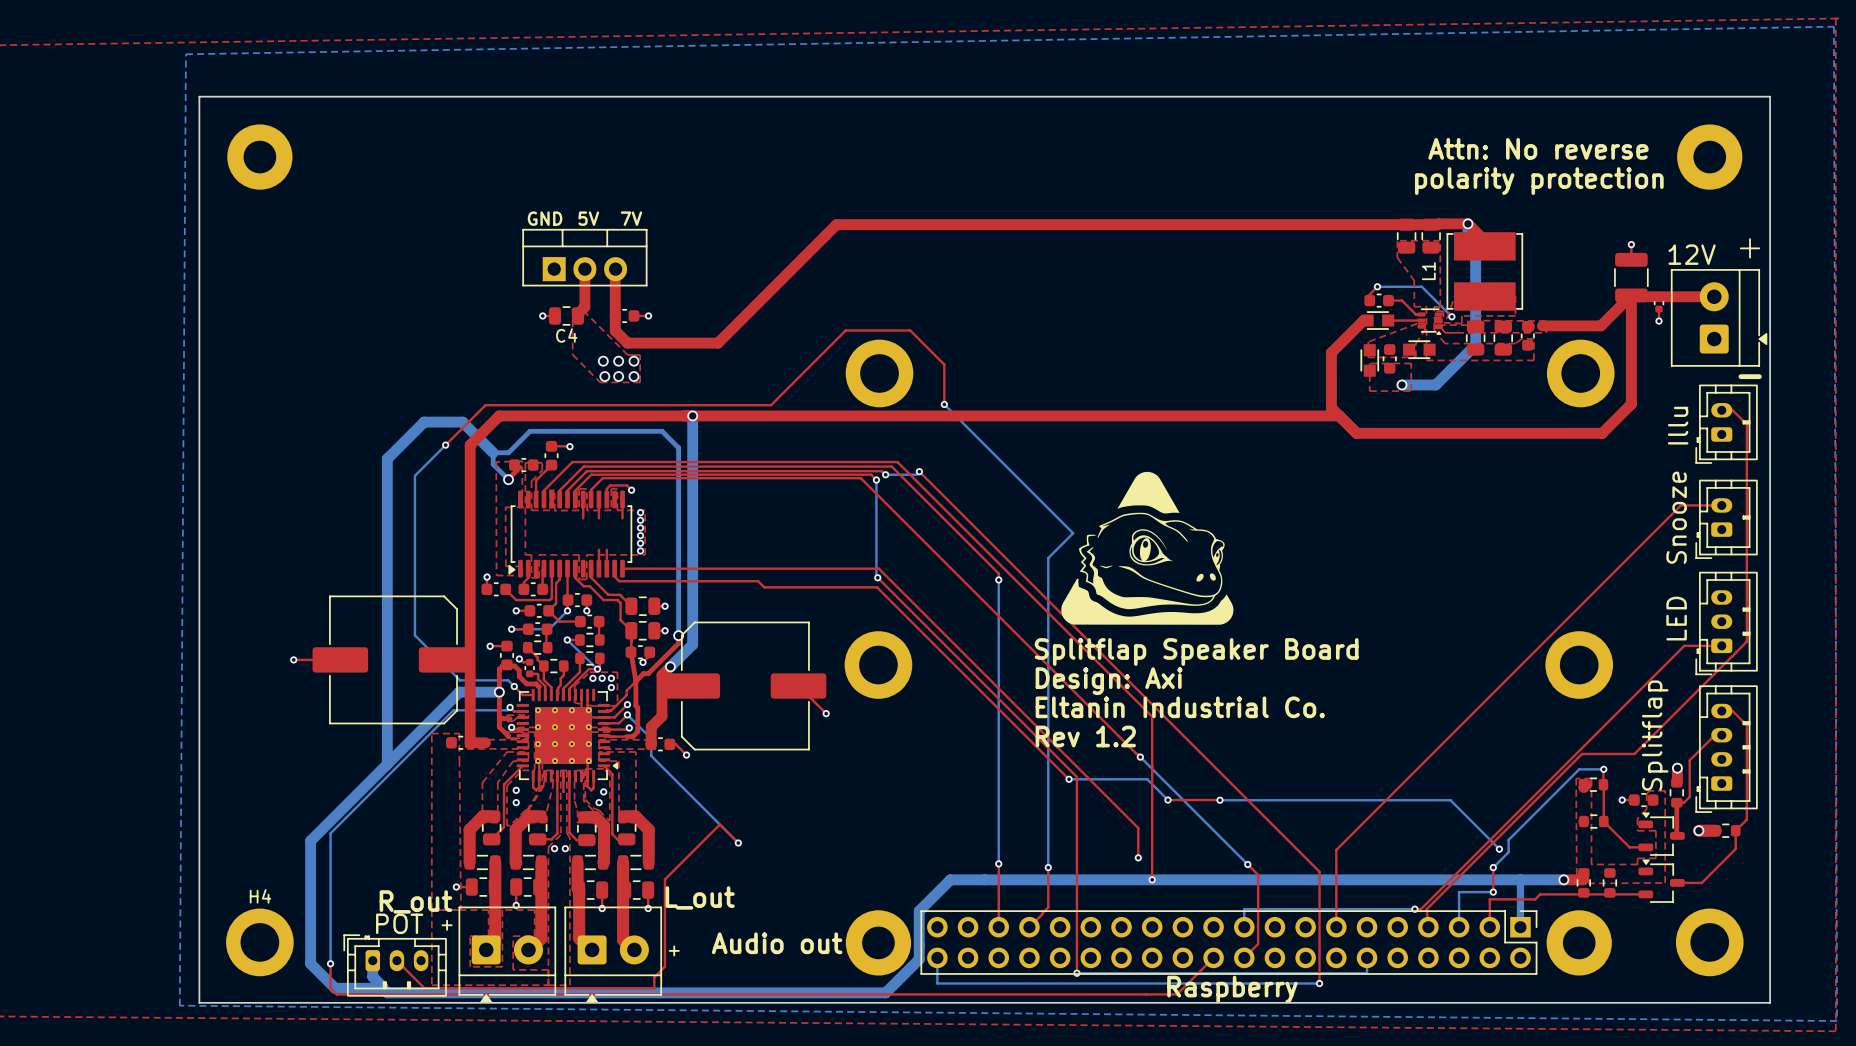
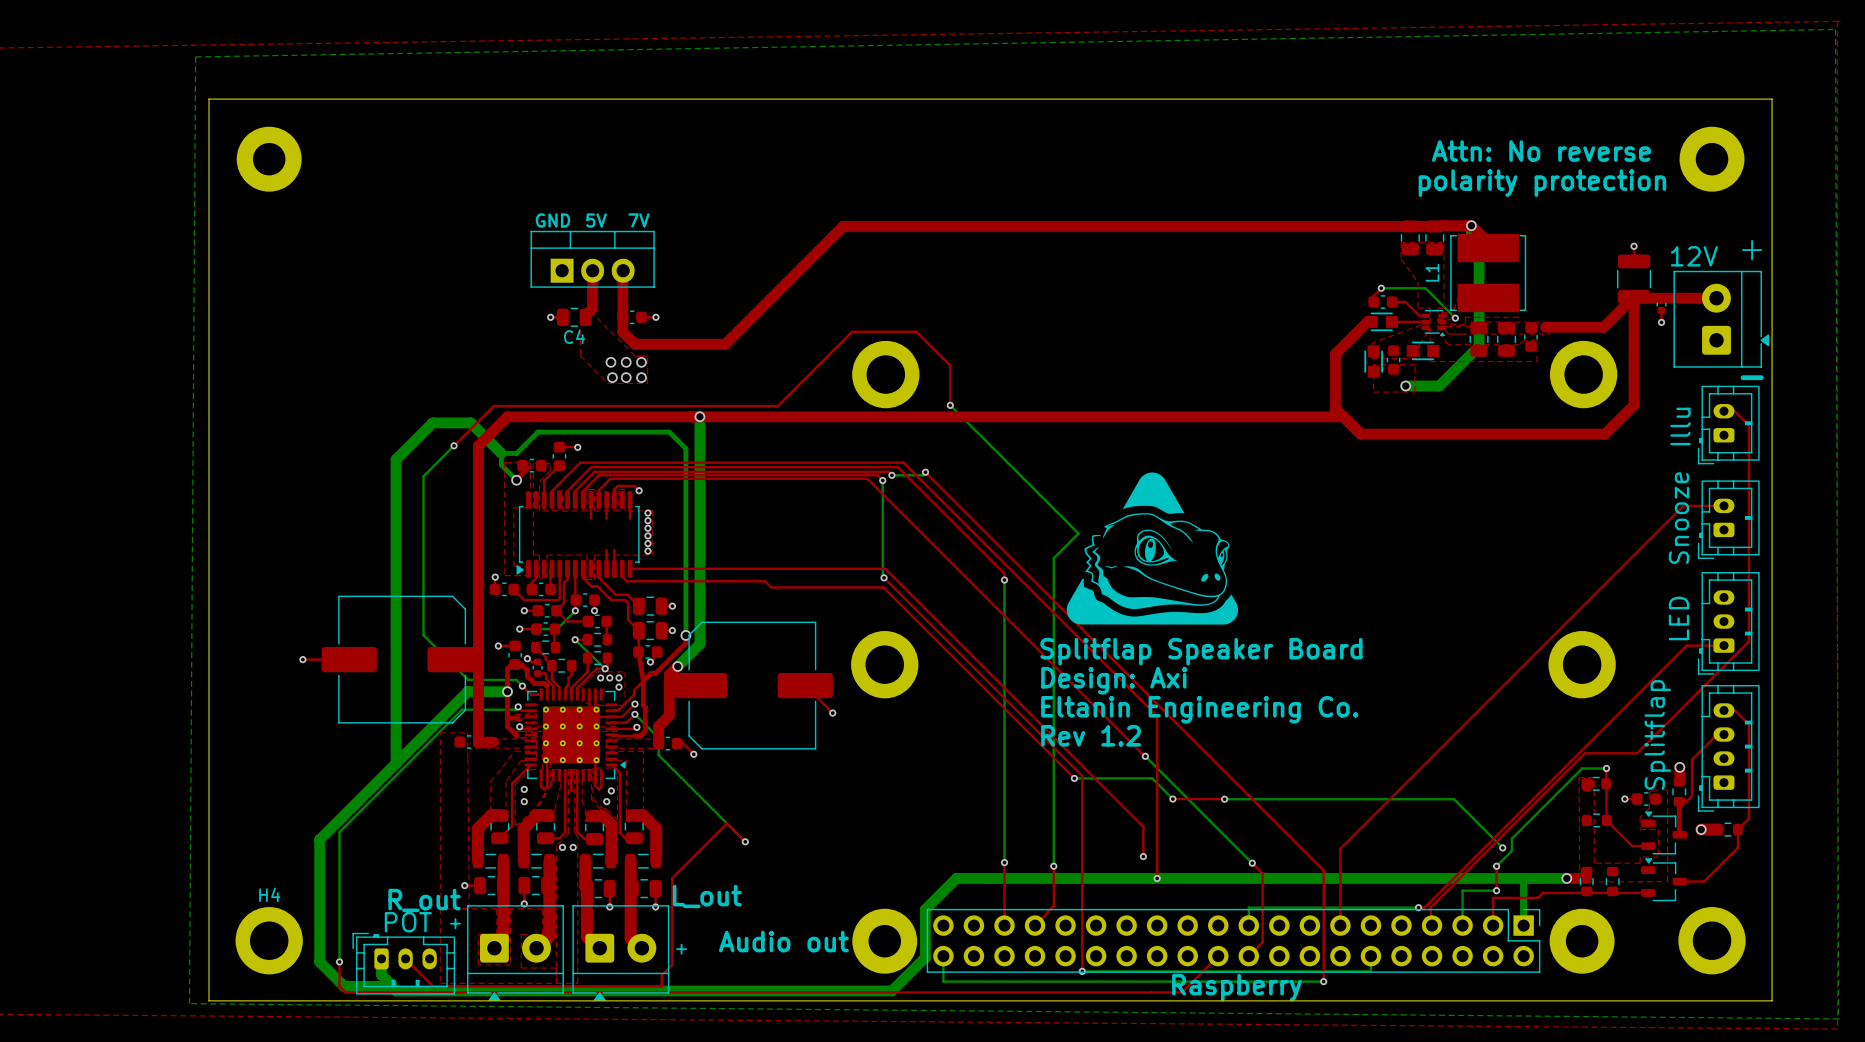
text: Eltanin Industrial Co. (1180, 707) -> Eltanin Engineering Co. (1199, 709)

